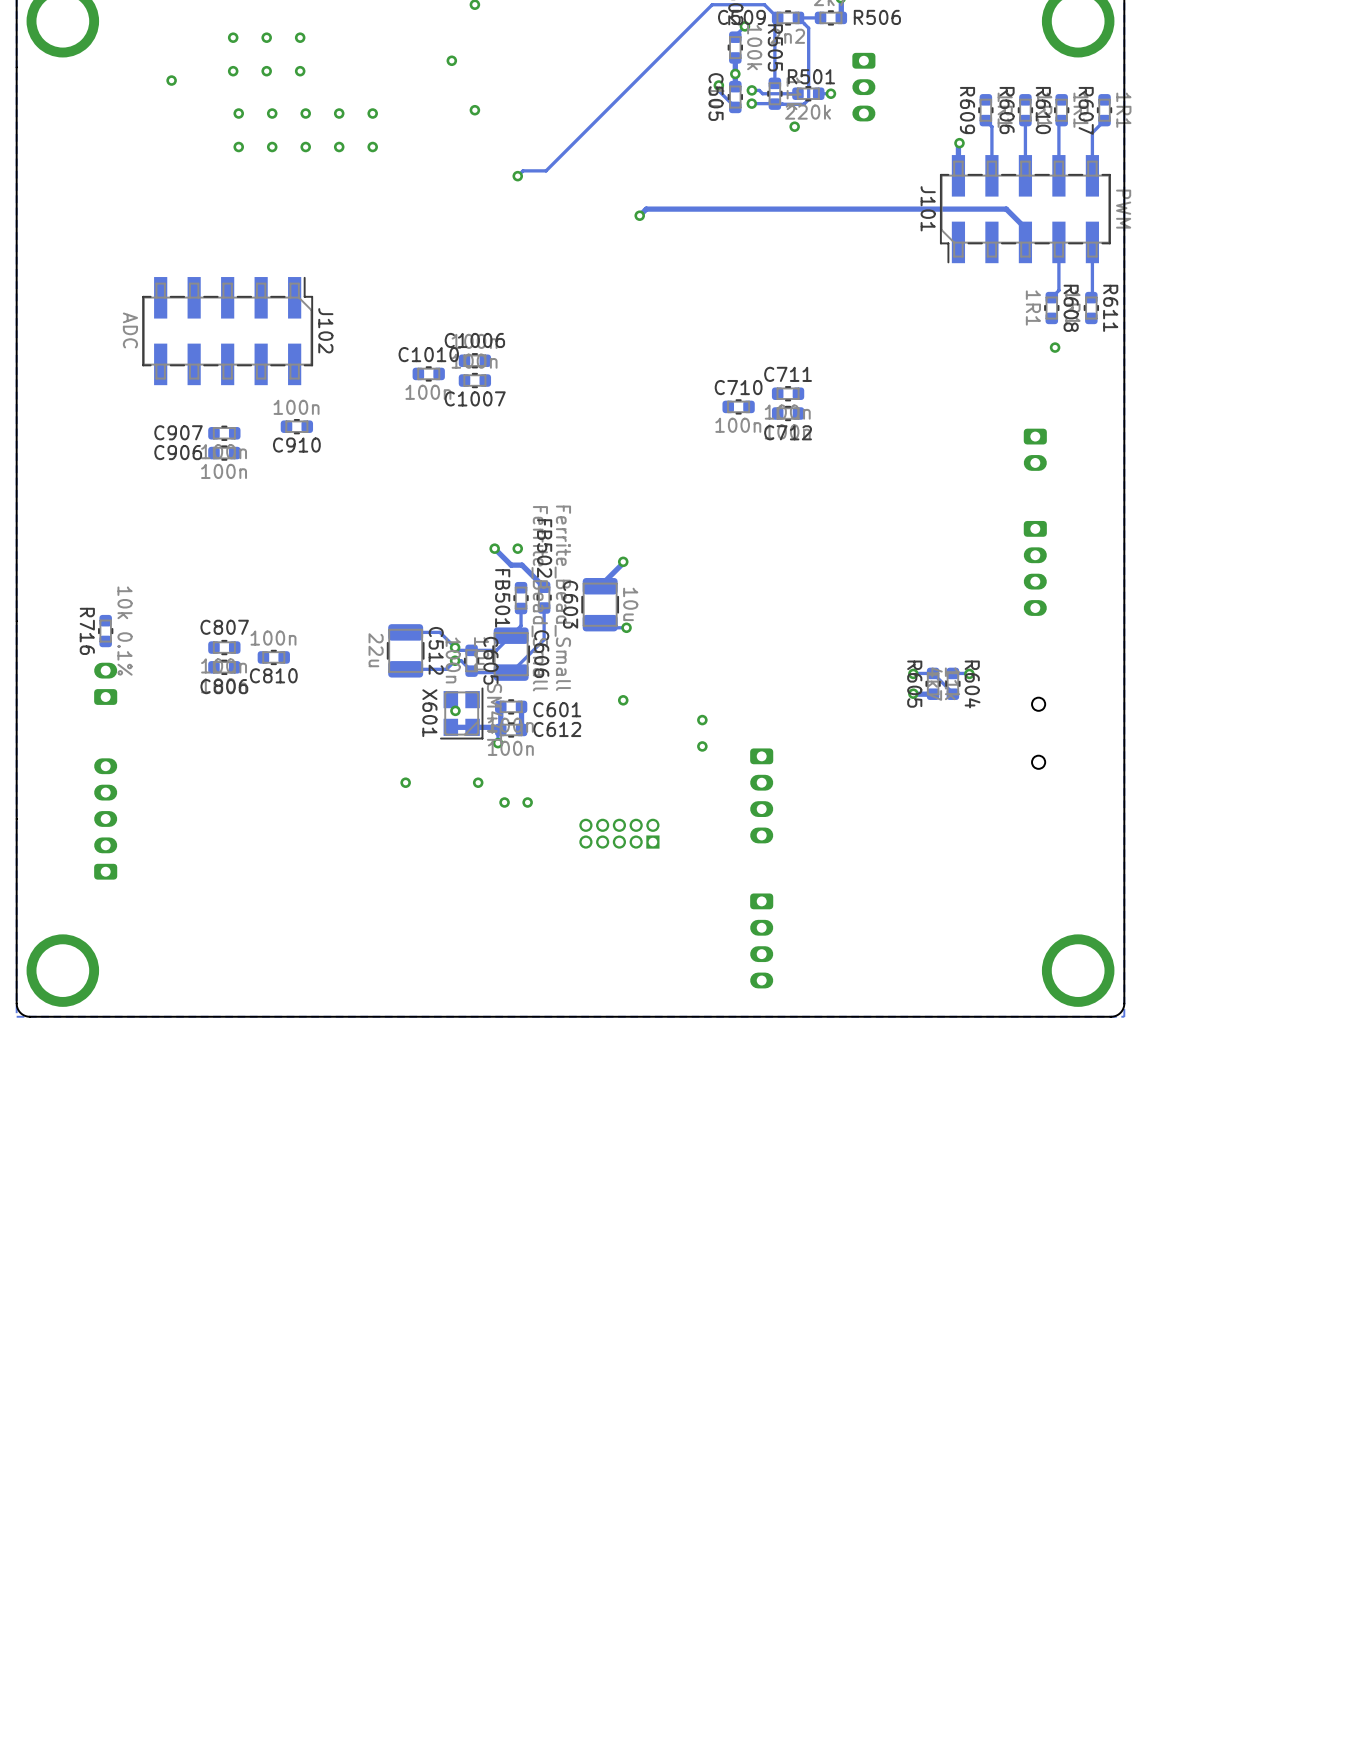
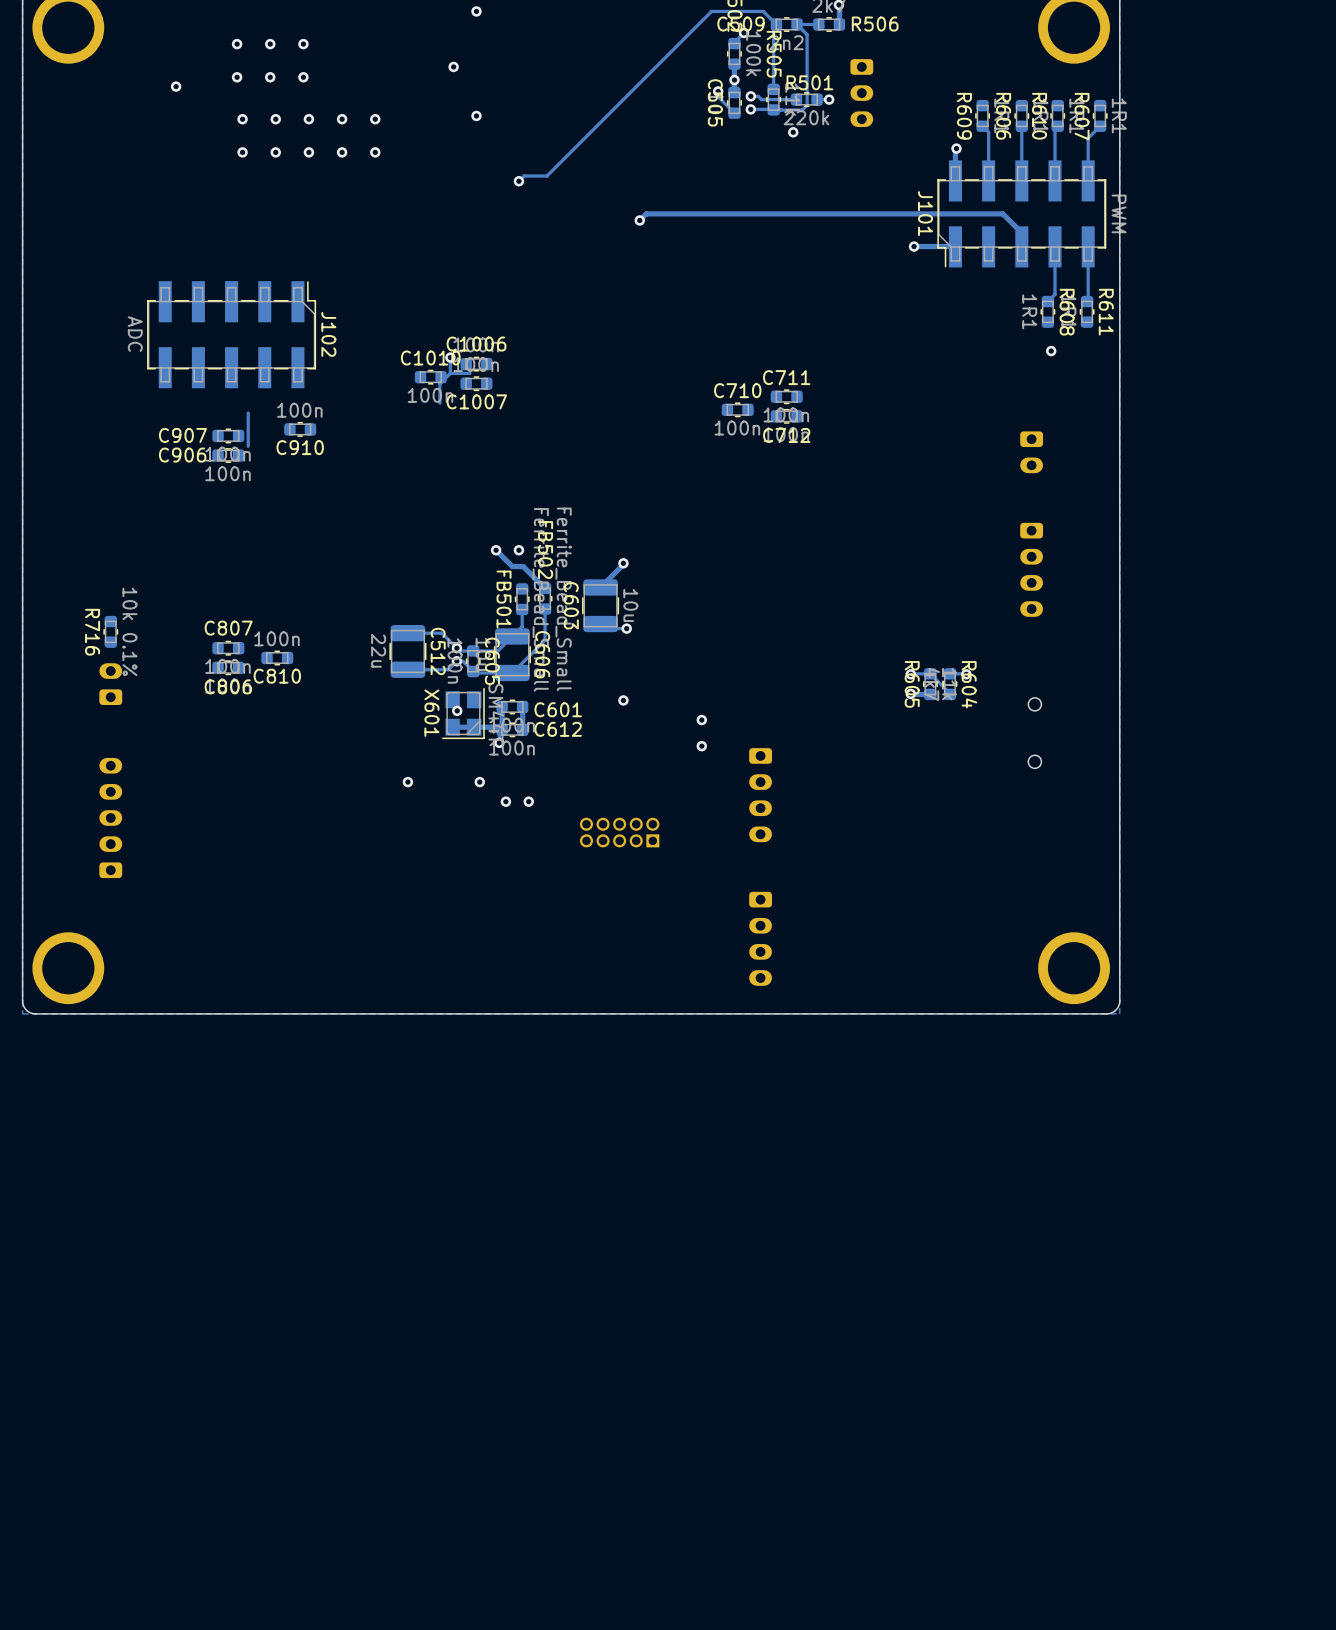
track: none -> (914, 246) (955, 246)
via: none -> (914, 246)
track: none -> (450, 357) (450, 373)
via: none -> (450, 357)
track: none -> (450, 373) (439, 383) (439, 403)
track: none -> (469, 373) (450, 373)
track: none -> (248, 413) (248, 446)

